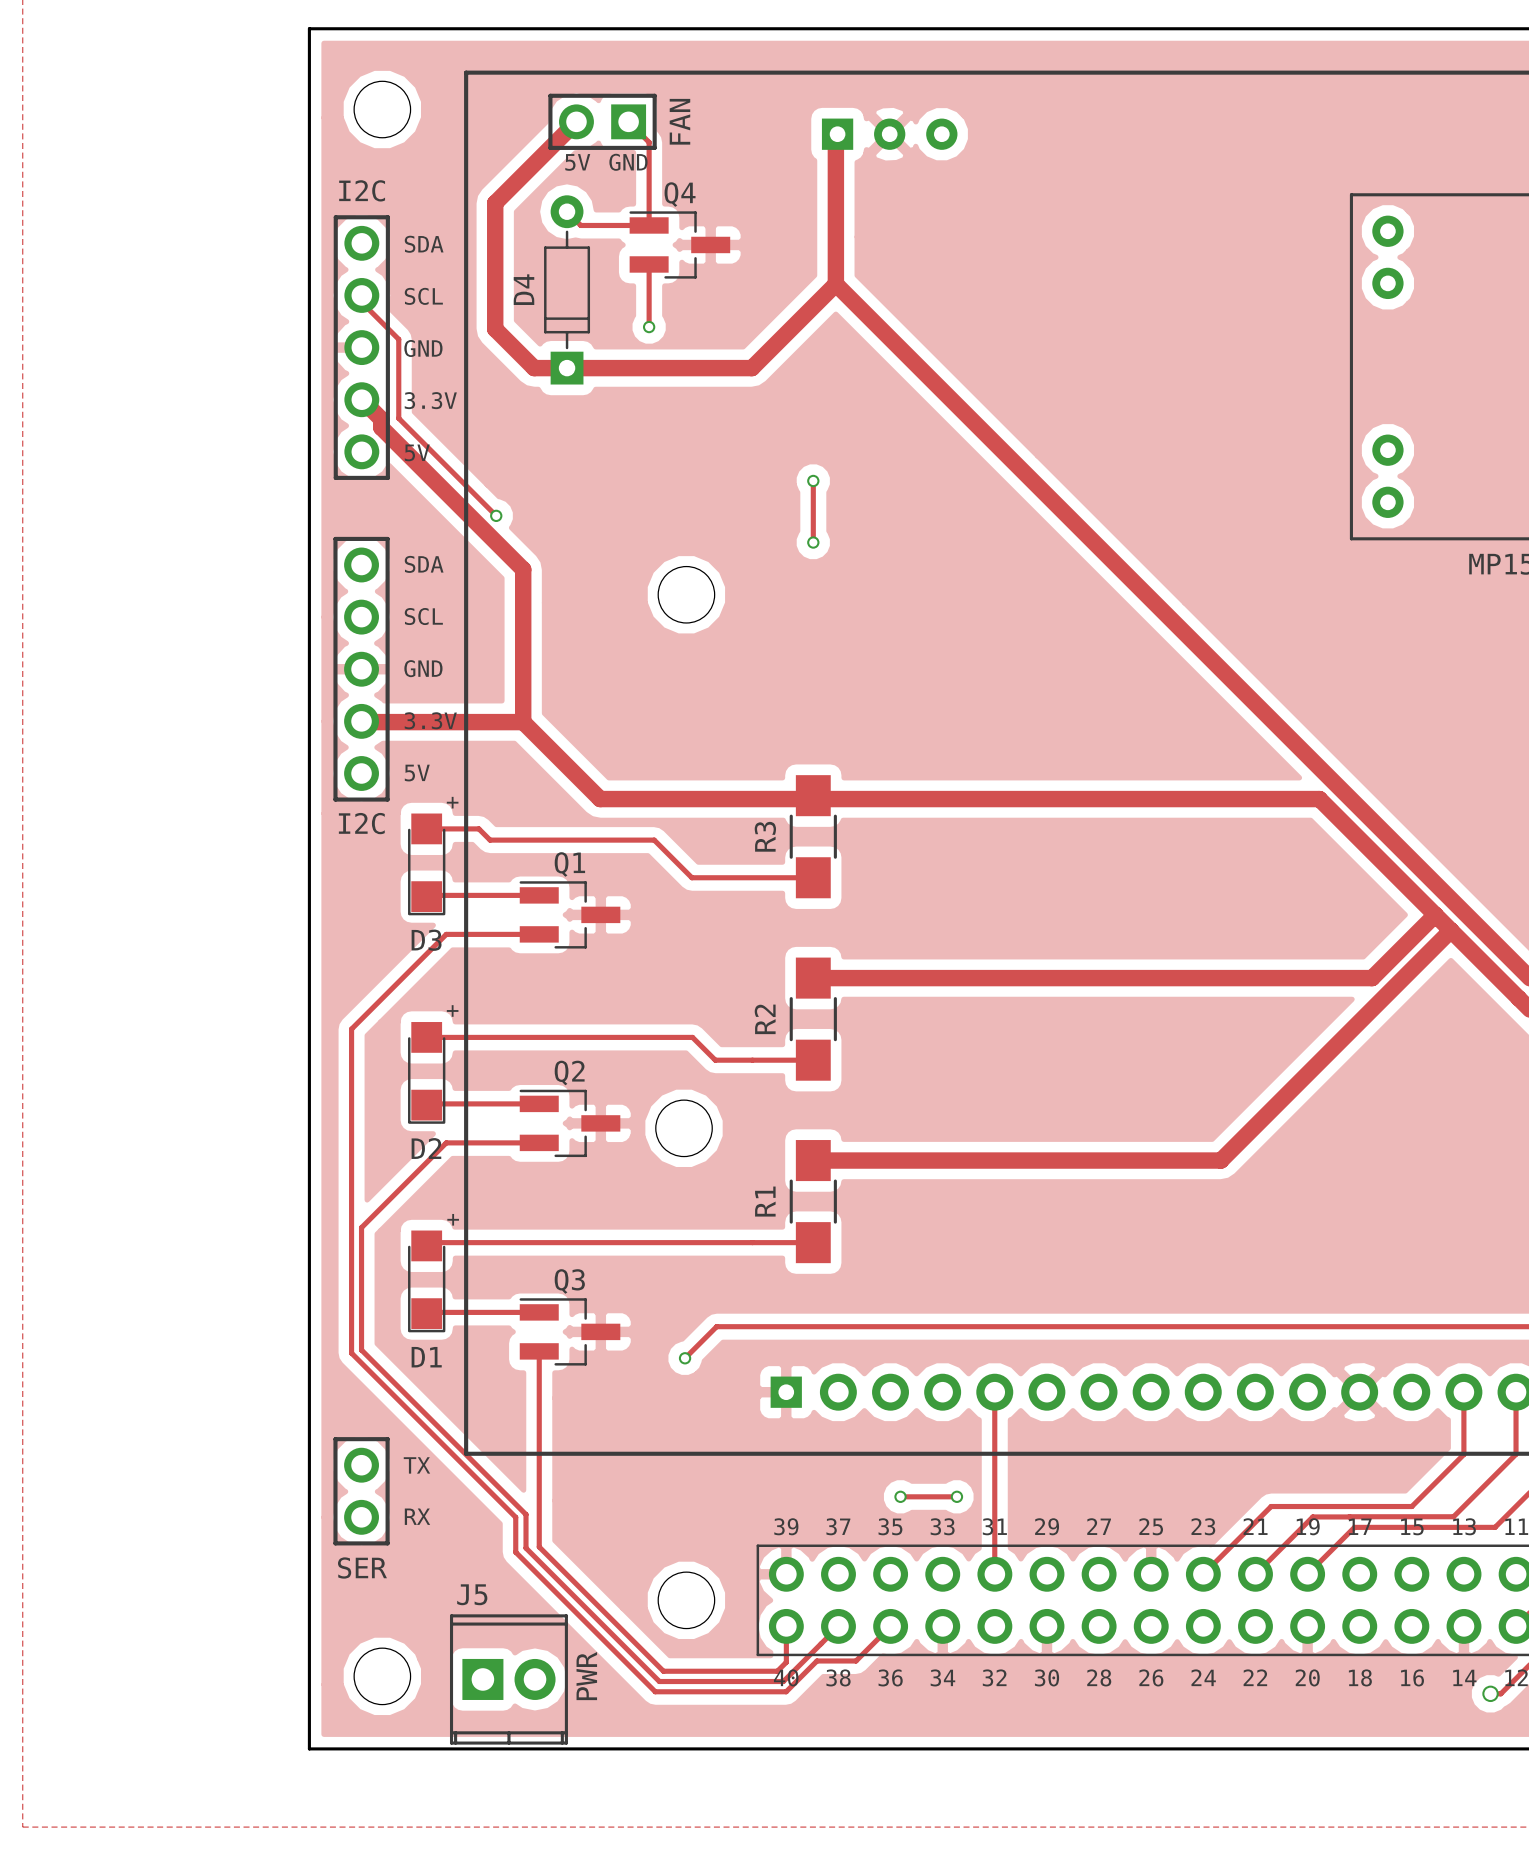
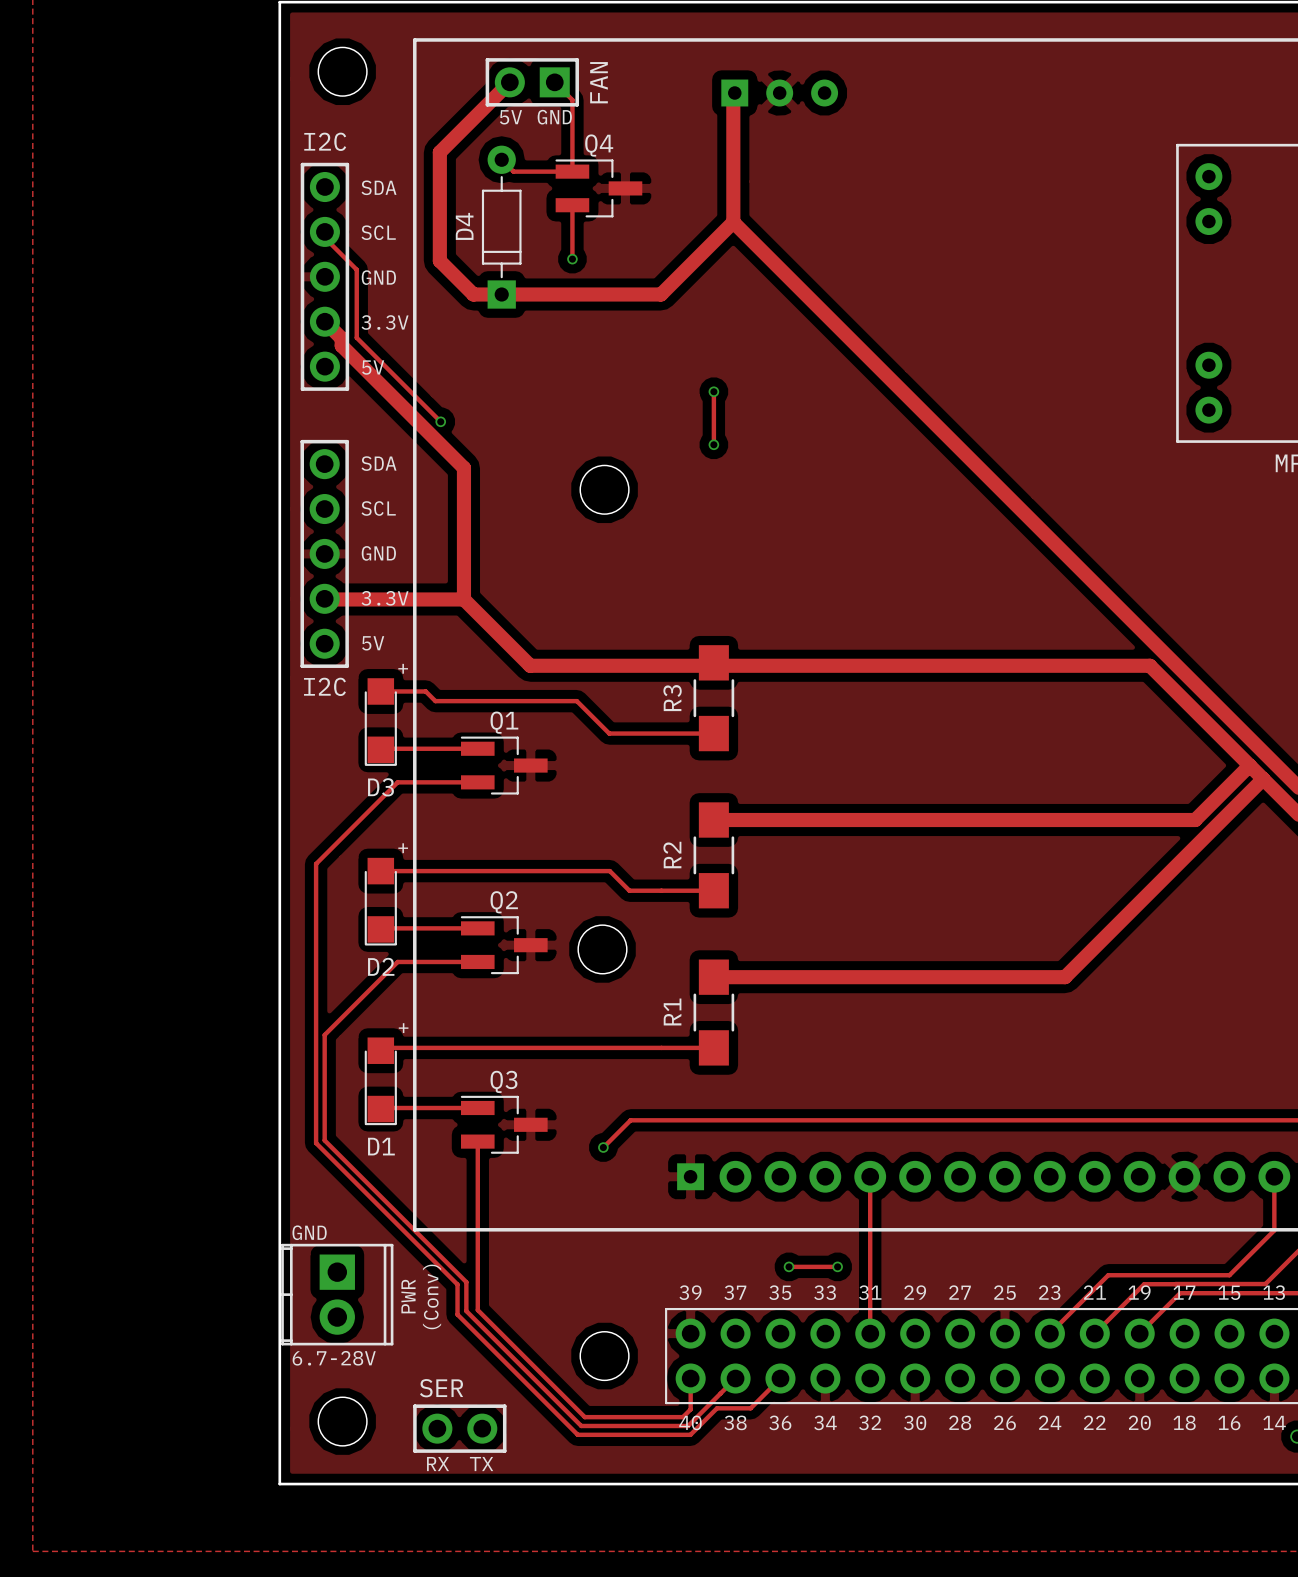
text: none -> GND (309, 1232)
text position: TX (416, 1465) -> TX (481, 1464)
part rotation: 0° (361, 1491) -> 90° clockwise (459, 1428)
part position: (361, 1491) -> (459, 1428)
text position: RX (417, 1516) -> RX (438, 1464)
part: none -> (337, 1294)
text: none -> PWR (408, 1296)
text: none -> (Conv) (432, 1296)
part value position: SER (362, 1568) -> SER (441, 1388)
text: none -> 6.7-28V (334, 1358)
J5: PWR (508, 1679) -> none

